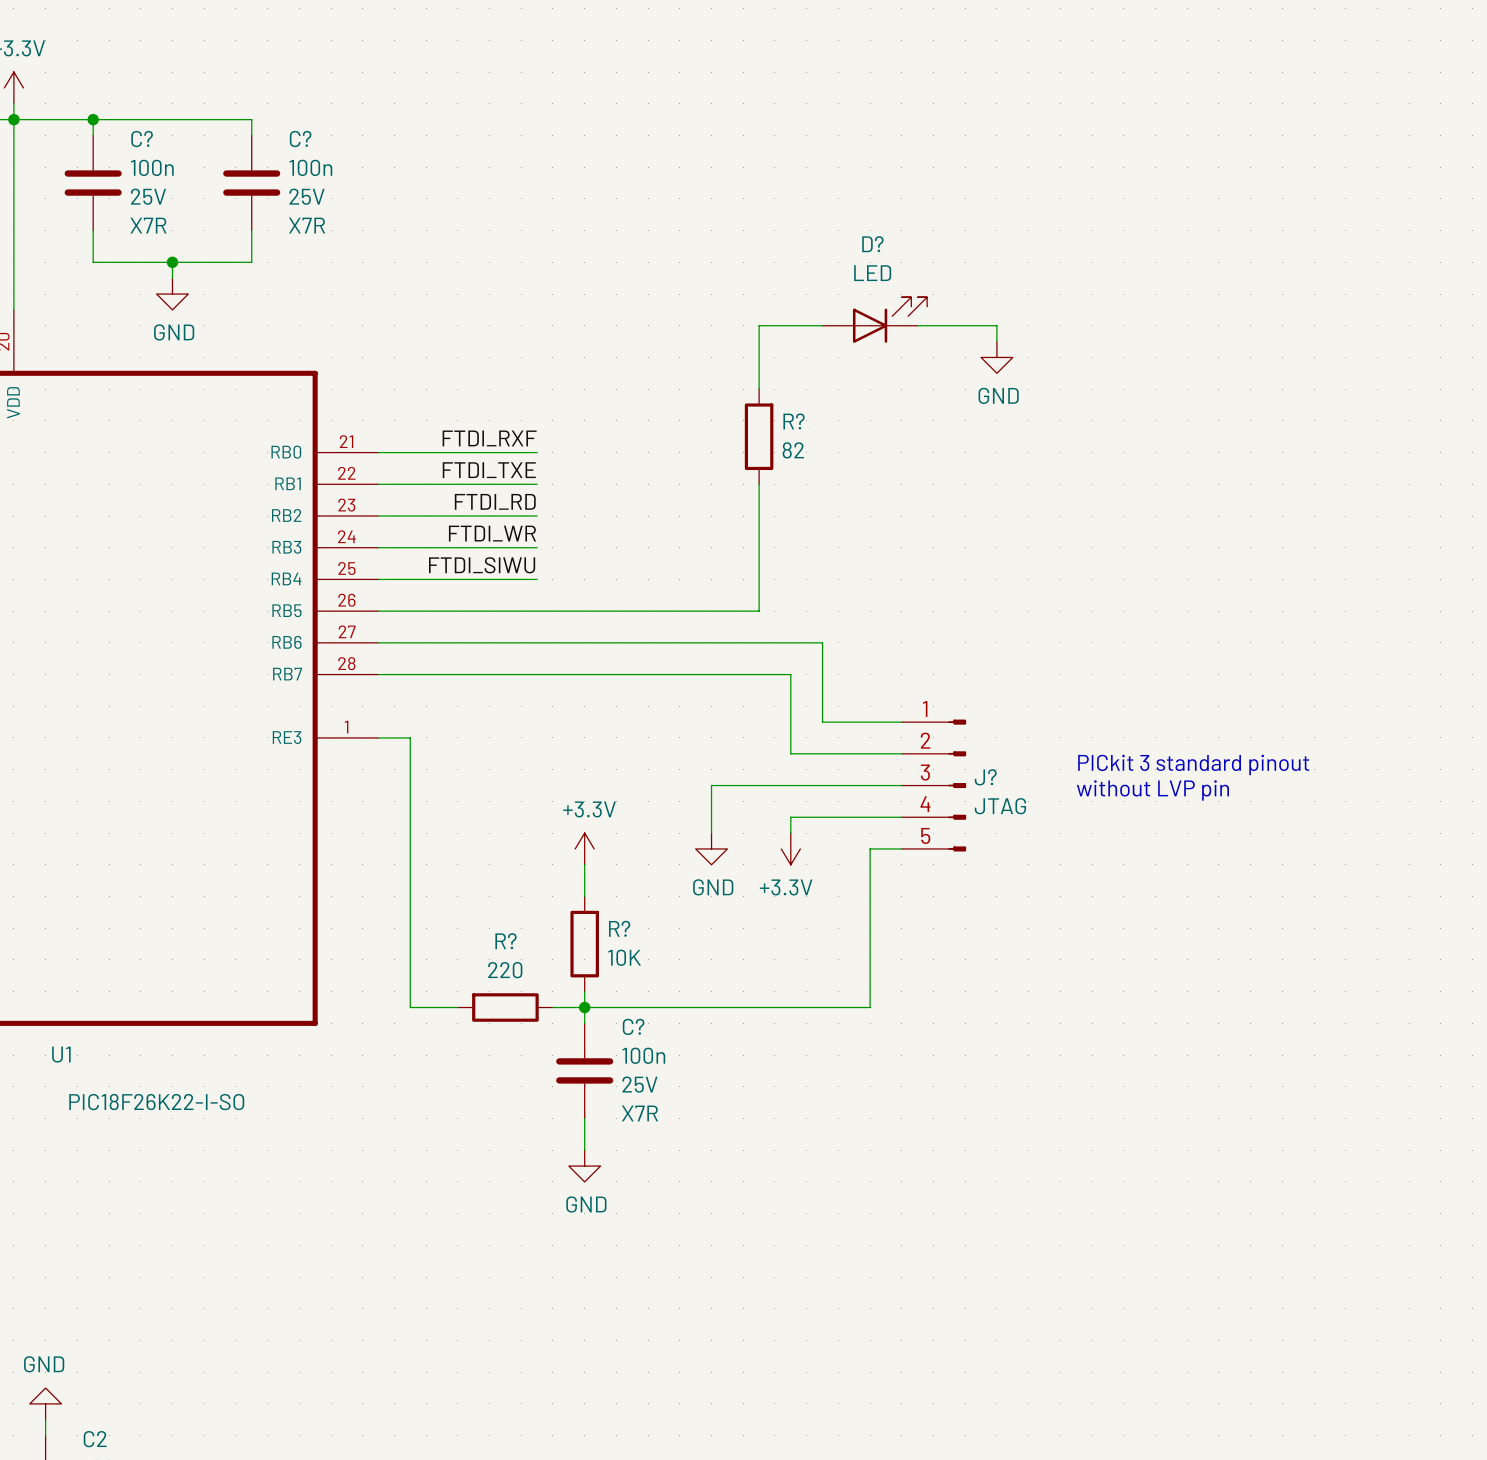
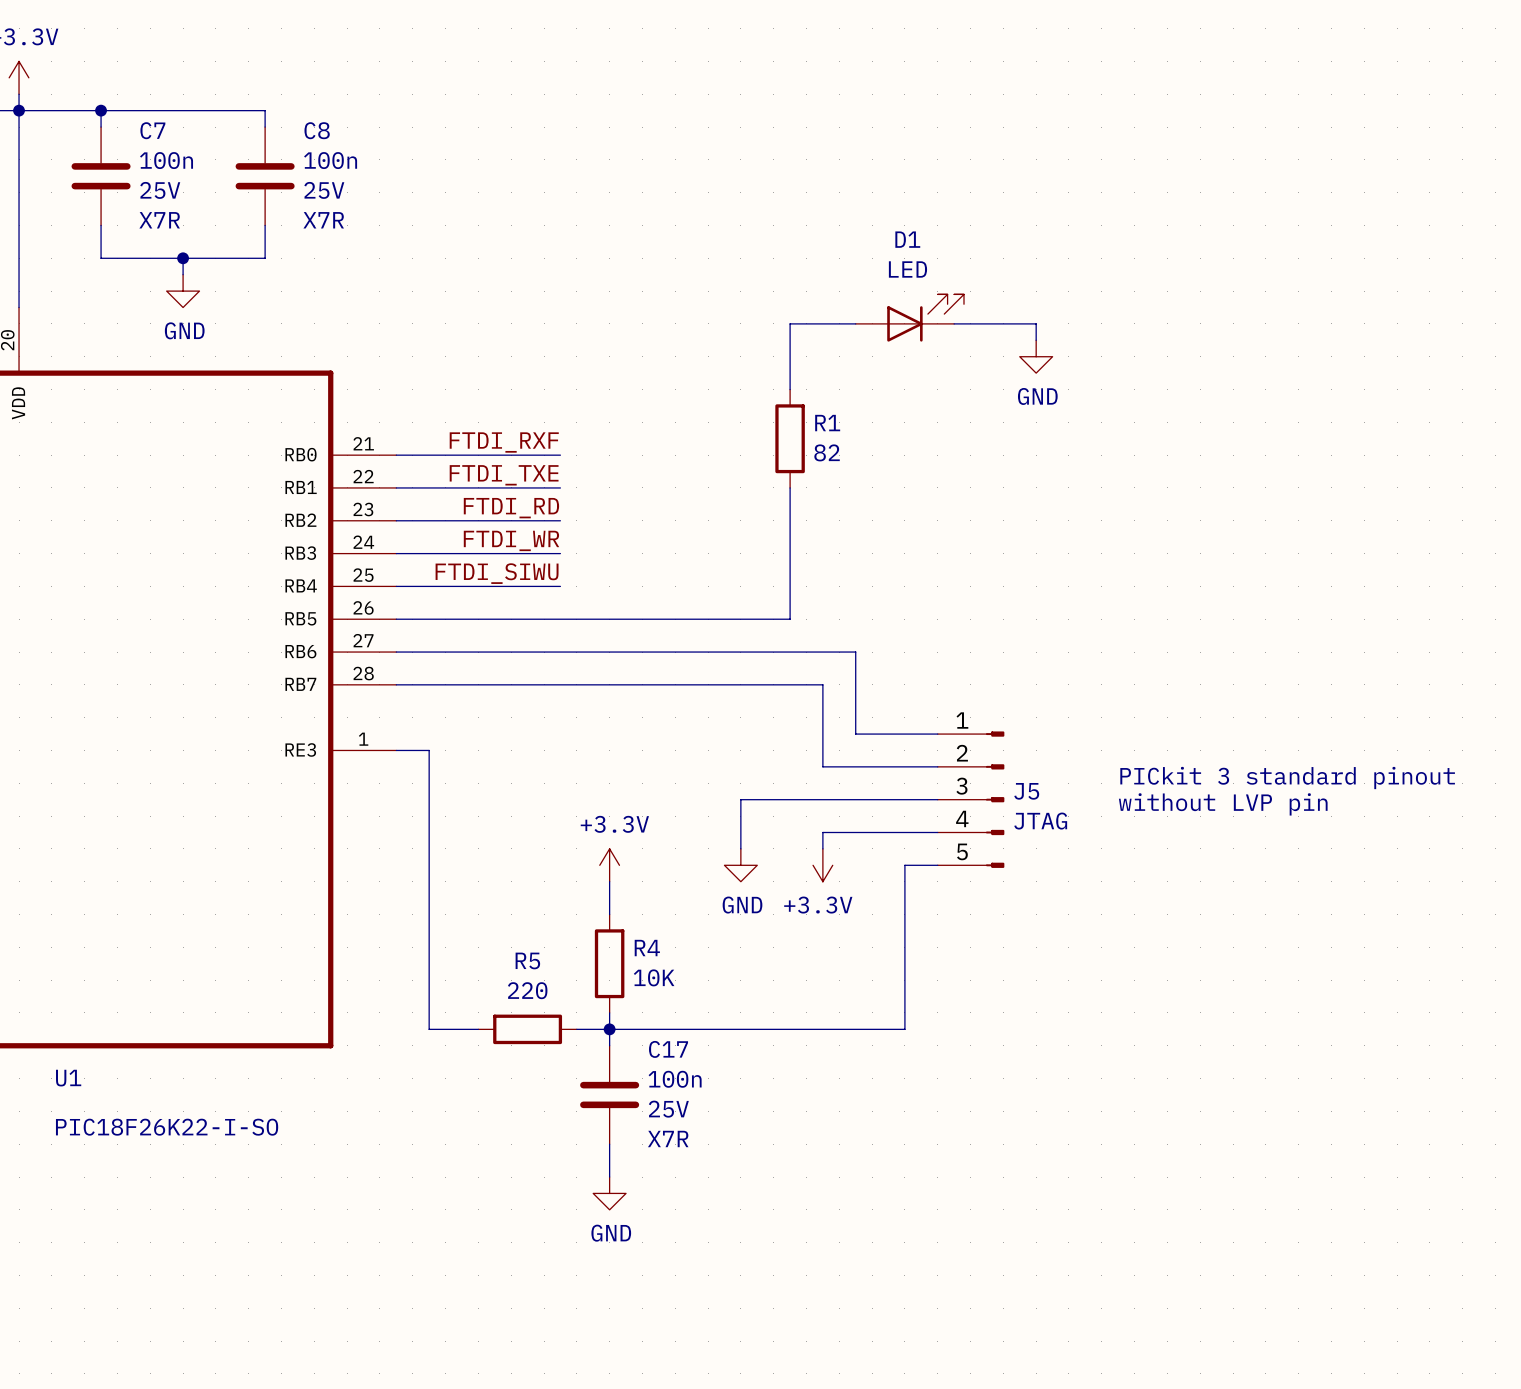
C? name: C? (142, 139) -> C7 (152, 130)
C? name: C? (300, 139) -> C8 (317, 130)
D? name: D? (872, 244) -> D1 (907, 239)
R? name: R? (794, 421) -> R1 (827, 423)
J? name: J? (985, 777) -> J5 (1026, 791)
R? name: R? (619, 928) -> R4 (647, 948)
R? name: R? (505, 941) -> R5 (527, 960)
C? name: C? (633, 1026) -> C17 (668, 1049)

